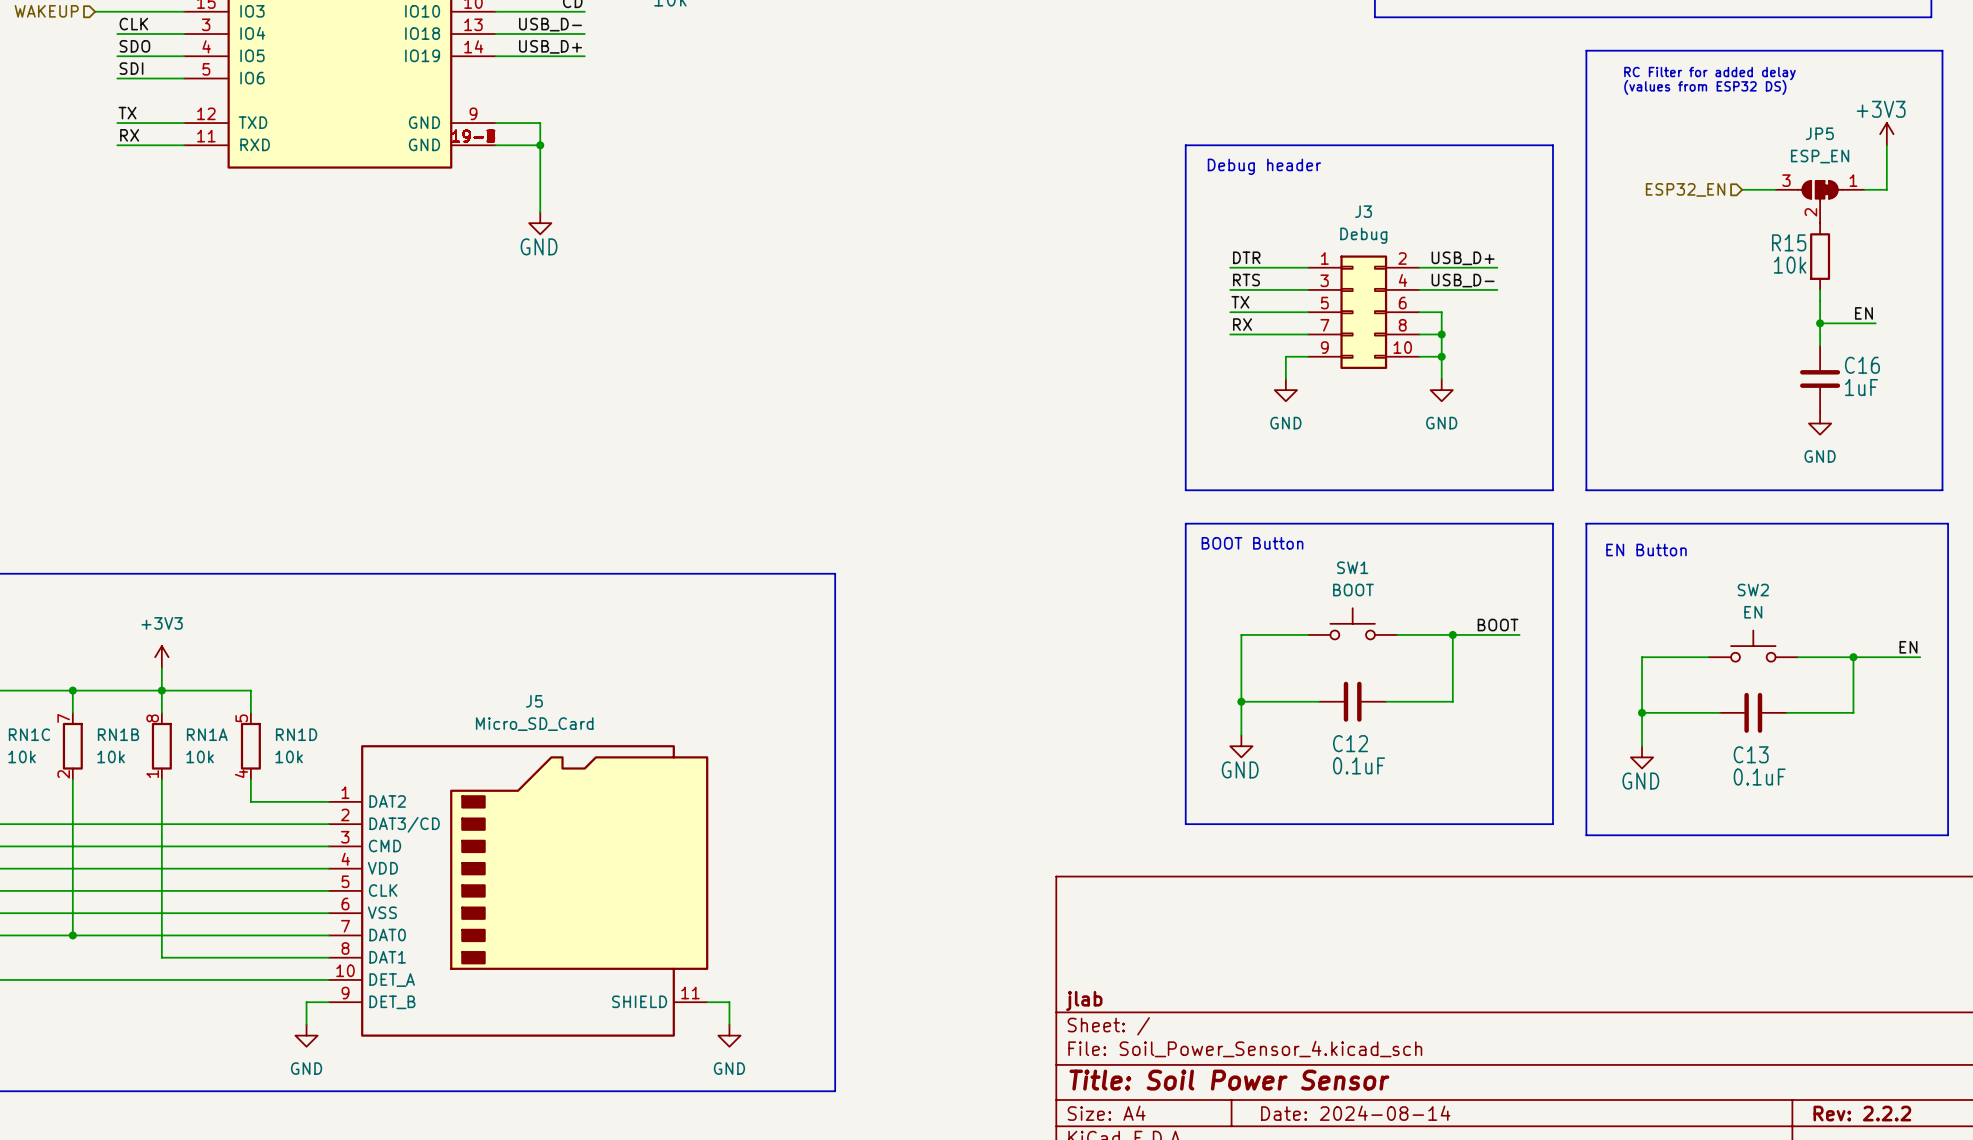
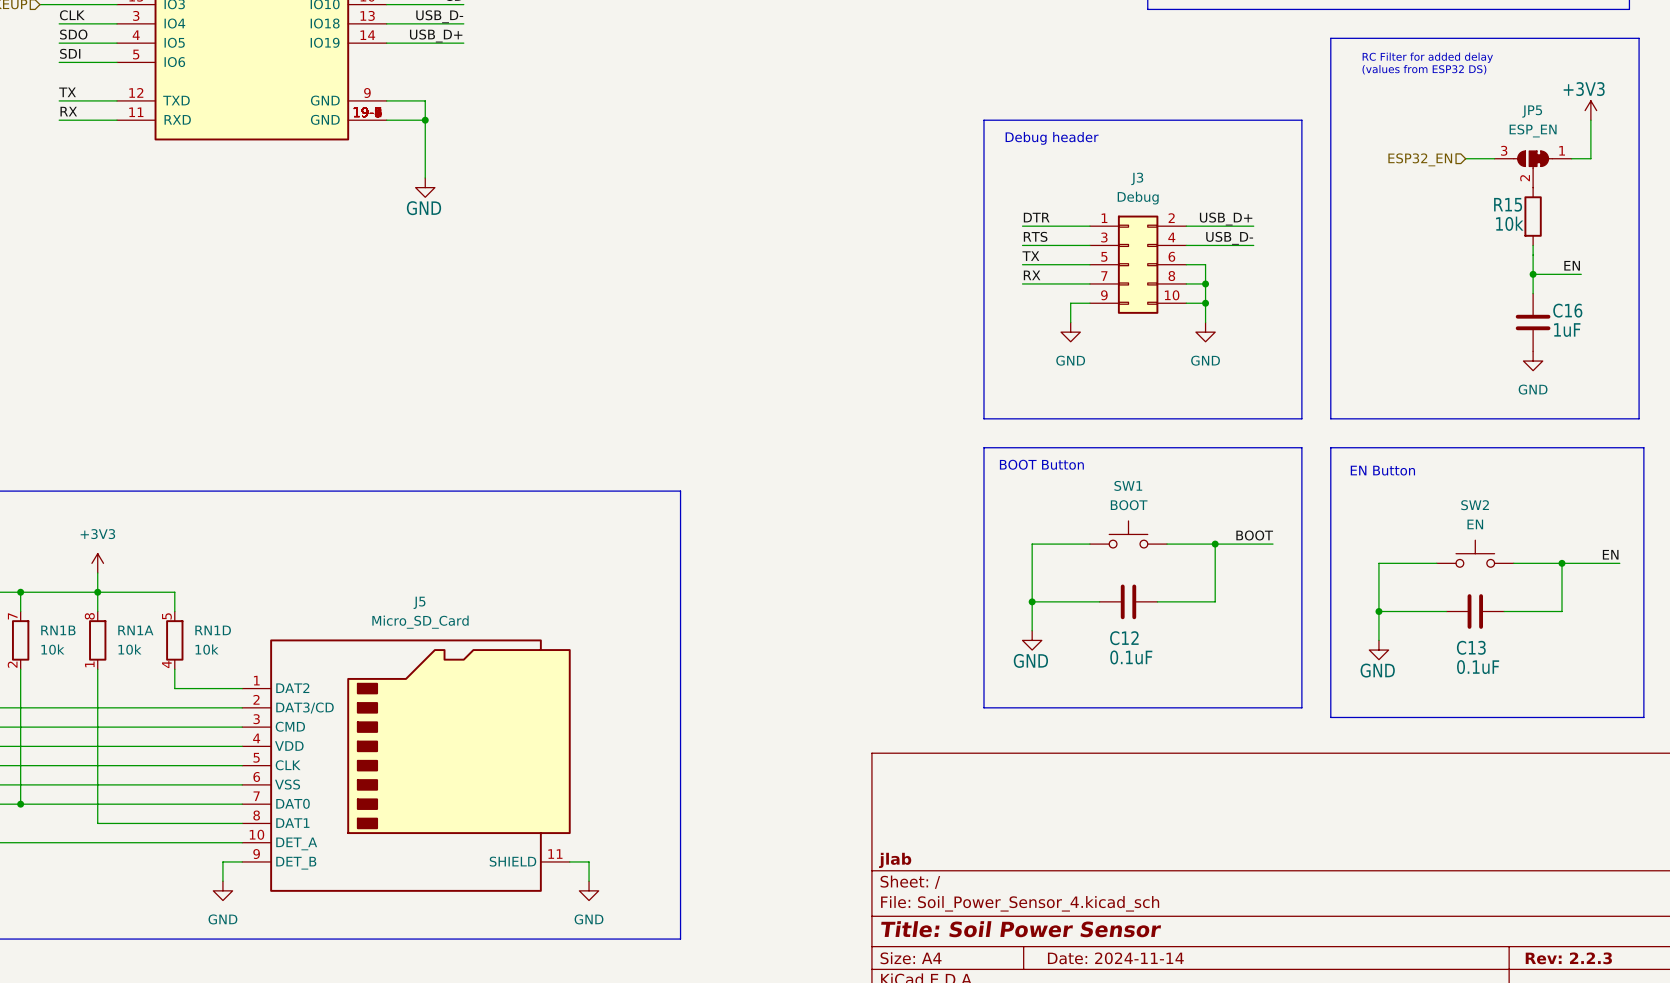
title block: Date: 2024-08-14 (1355, 1113) -> Date: 2024-11-14 (1115, 958)
title block: Rev: 2.2.2 (1862, 1113) -> Rev: 2.2.3 (1568, 958)

